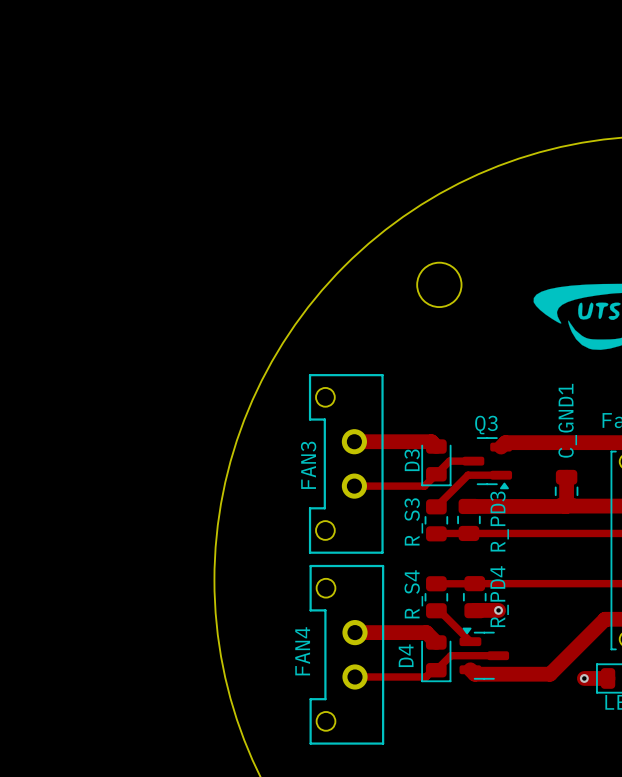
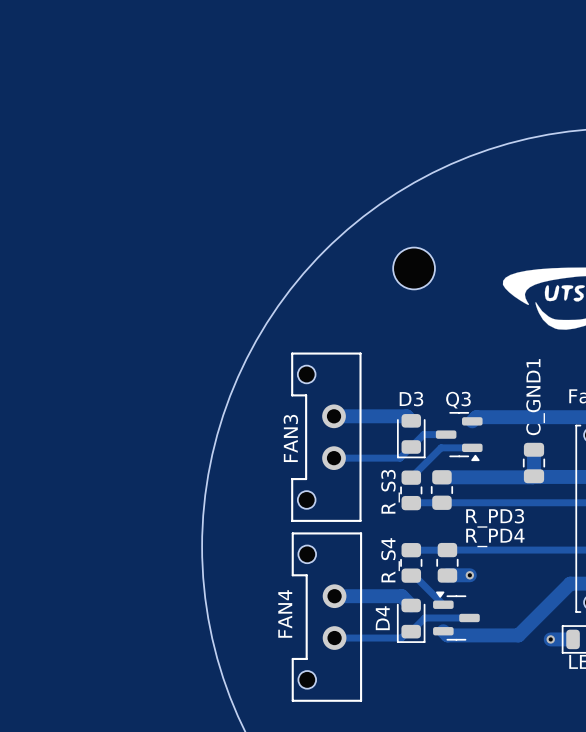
D3 name rotation: 0° (412, 460) -> 90° clockwise (411, 399)
D3 name position: D3 (412, 460) -> D3 (411, 399)
R_PD3 name rotation: 0° (499, 521) -> 90° clockwise (495, 518)
text rotation: 0° (499, 596) -> 90° clockwise (495, 537)

